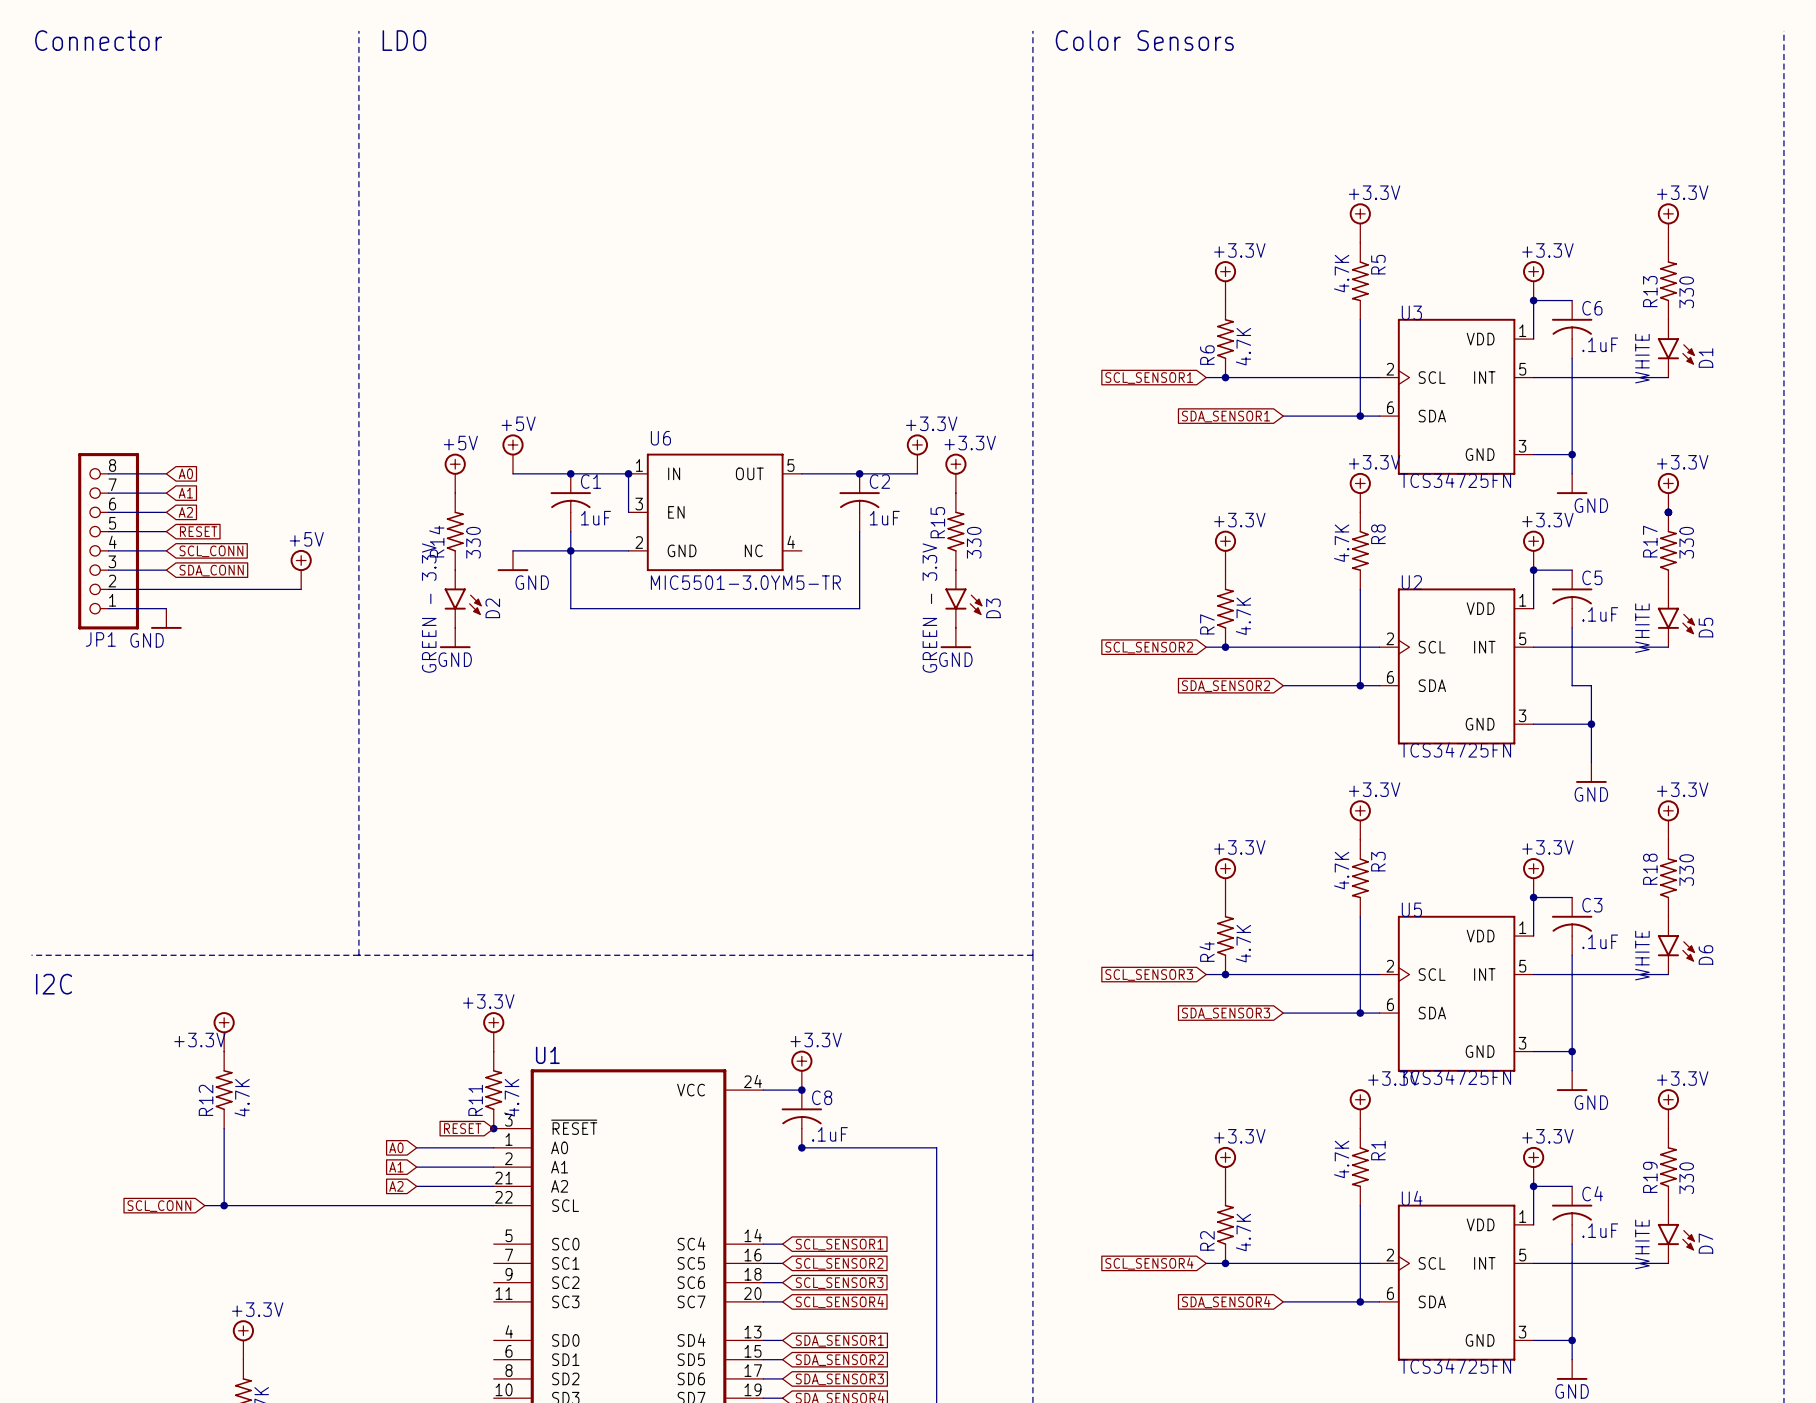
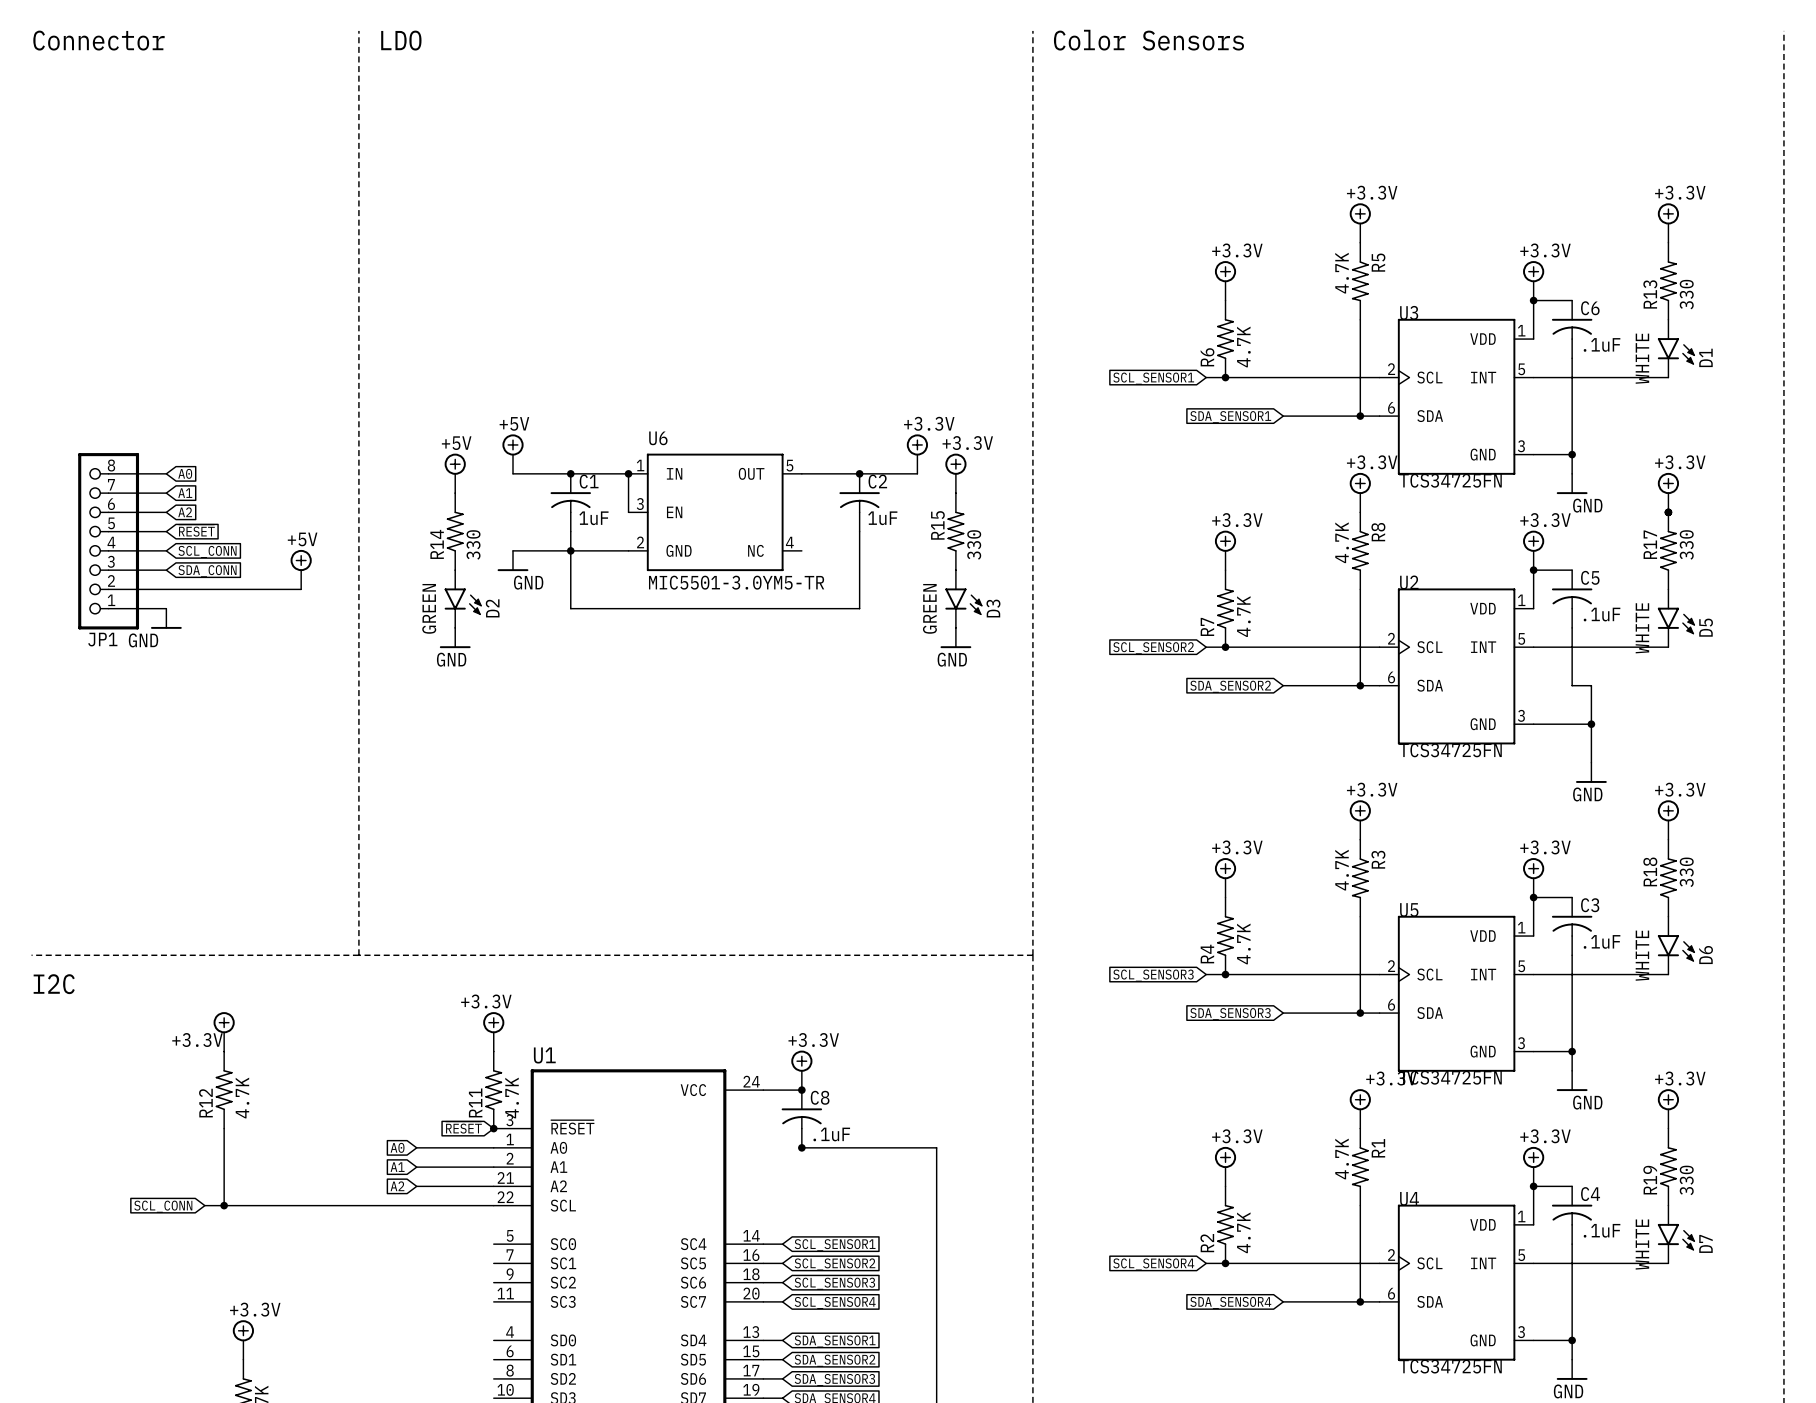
D2 value: GREEN - 3.3V (429, 608) -> GREEN (429, 608)
D3 value: GREEN - 3.3V (929, 608) -> GREEN (929, 608)

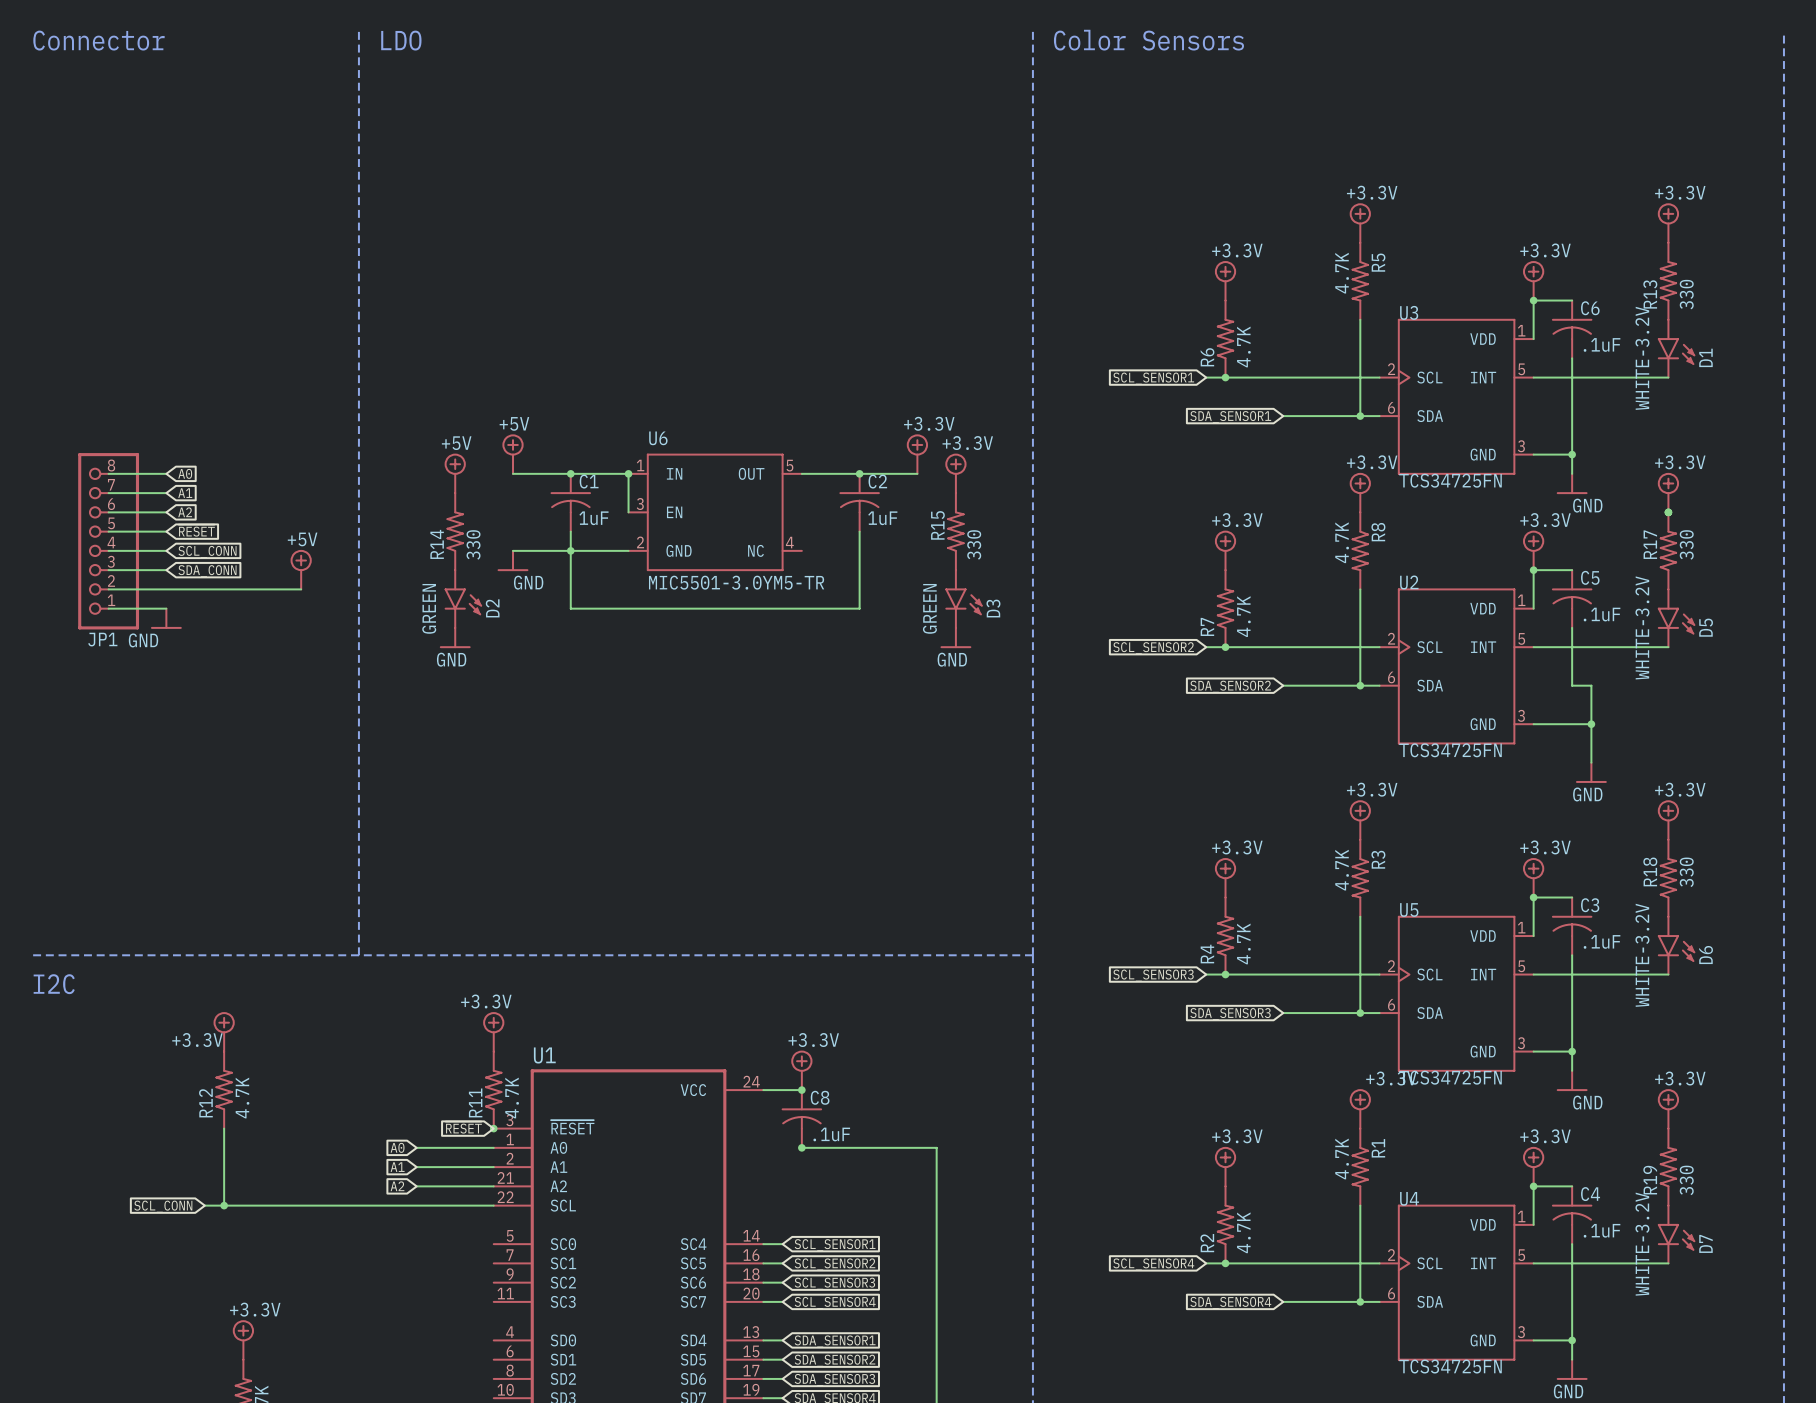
D1 value: WHITE (1642, 358) -> WHITE-3.2V (1642, 358)
D5 value: WHITE (1642, 628) -> WHITE-3.2V (1642, 627)
D6 value: WHITE (1642, 955) -> WHITE-3.2V (1642, 955)
D7 value: WHITE (1642, 1244) -> WHITE-3.2V (1642, 1244)

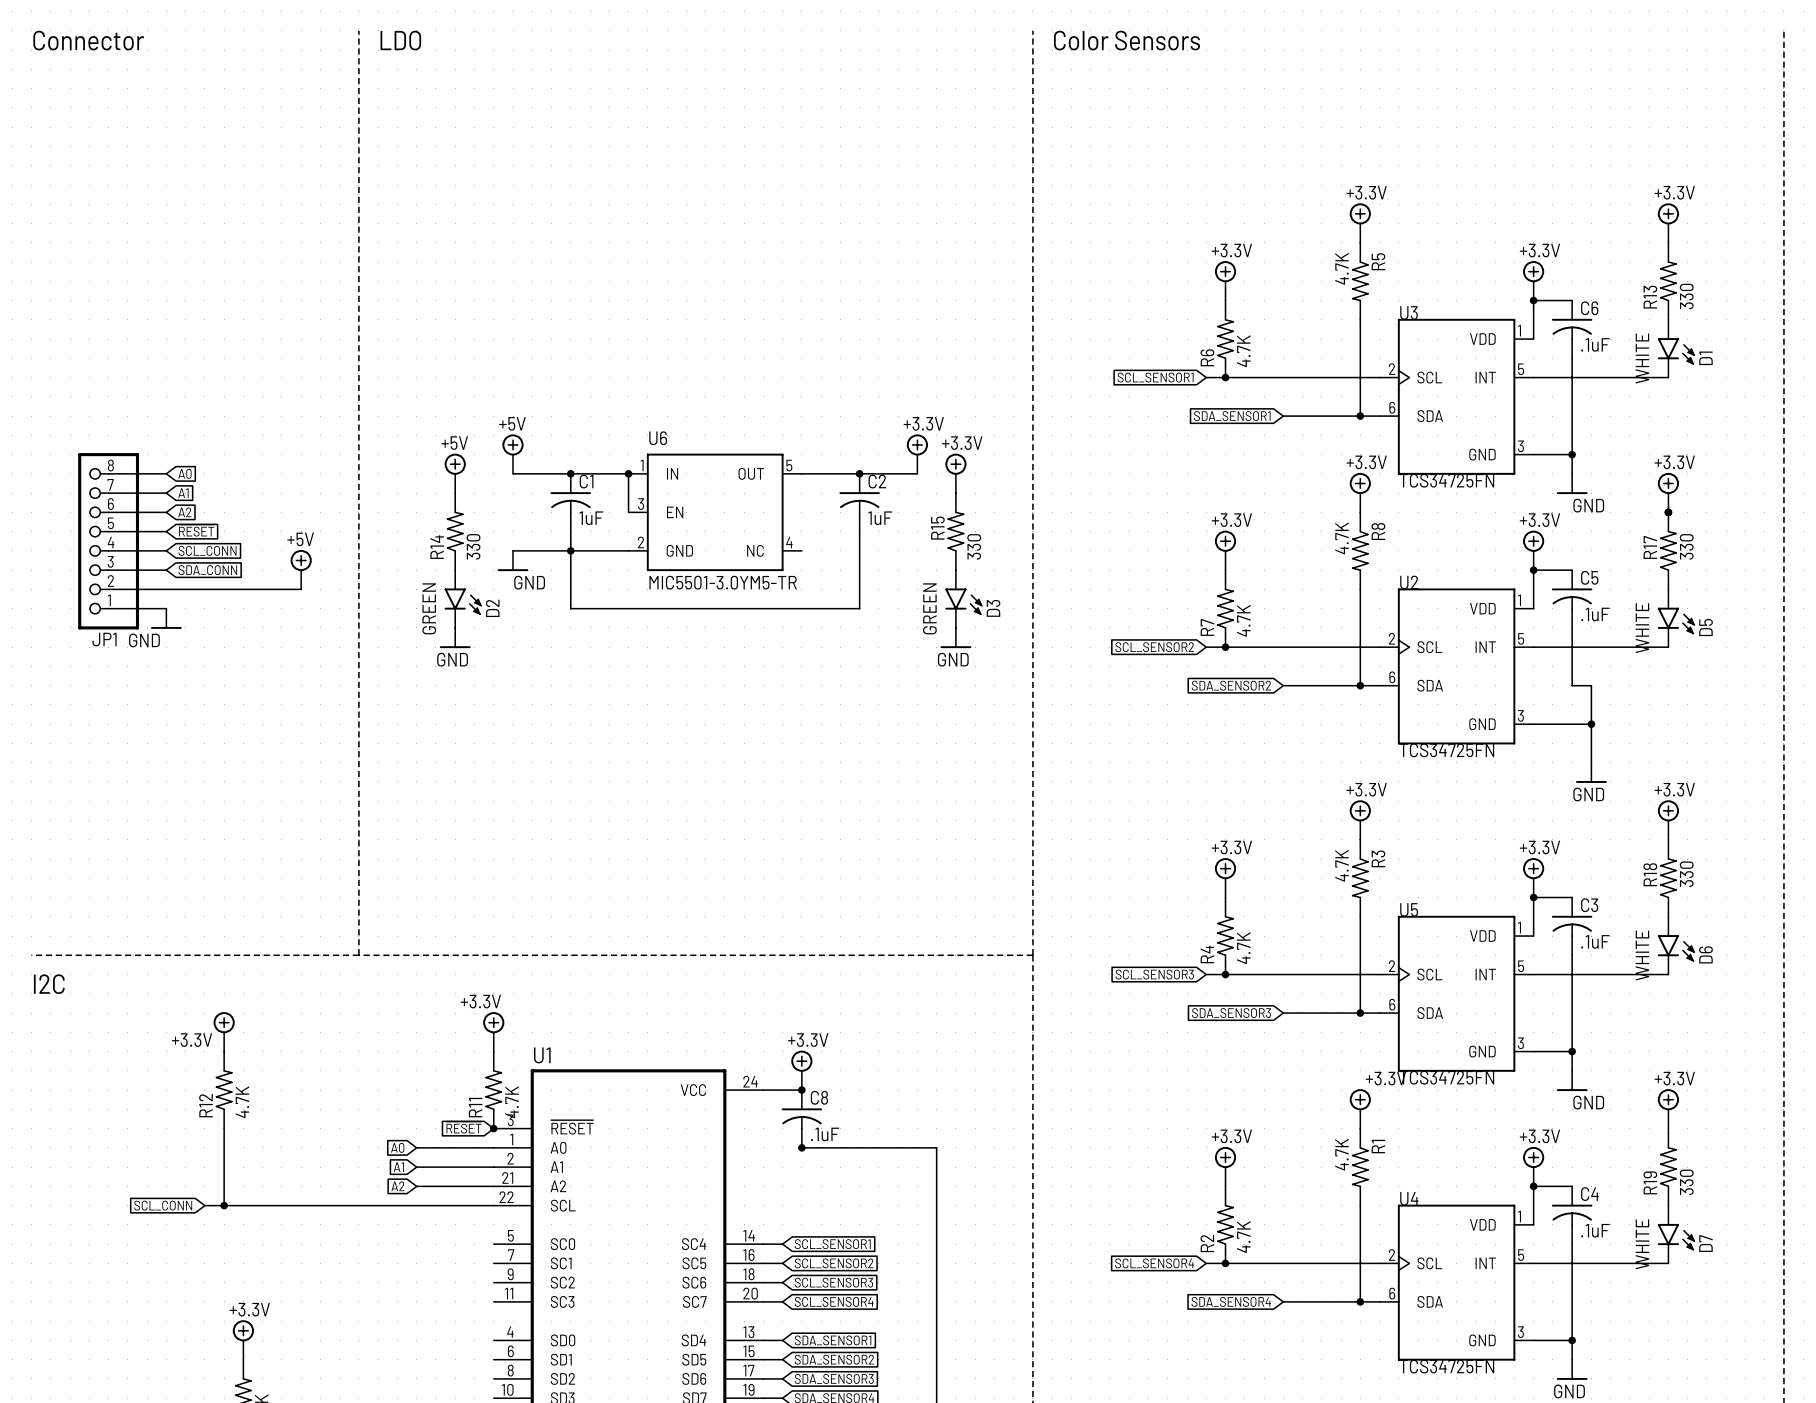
D1 value: WHITE-3.2V (1642, 358) -> WHITE (1642, 358)
D5 value: WHITE-3.2V (1642, 627) -> WHITE (1642, 628)
D6 value: WHITE-3.2V (1642, 955) -> WHITE (1642, 955)
D7 value: WHITE-3.2V (1642, 1244) -> WHITE (1642, 1244)

